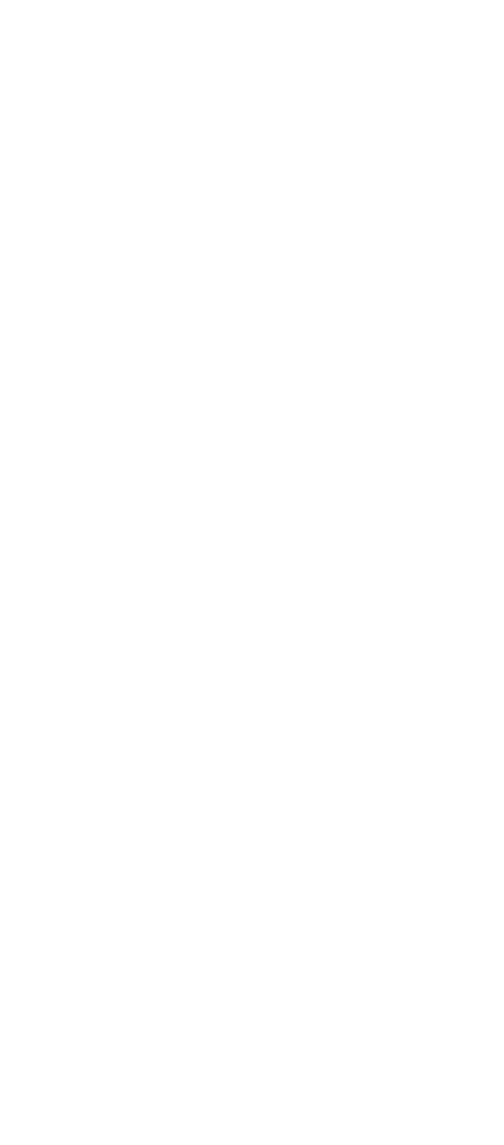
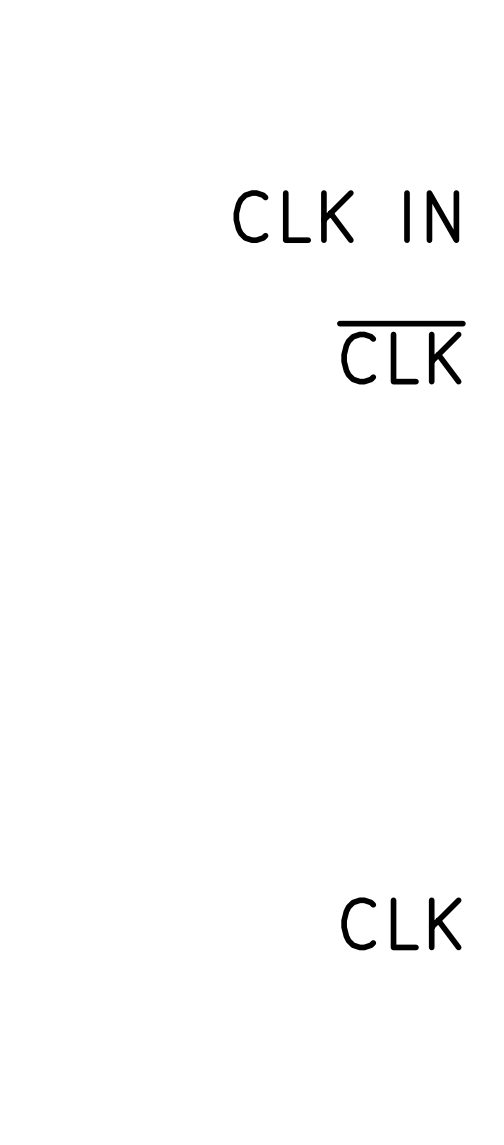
text: none -> CLK IN (346, 216)
text: none -> ~{CLK} (401, 352)
text: none -> CLK (401, 923)

